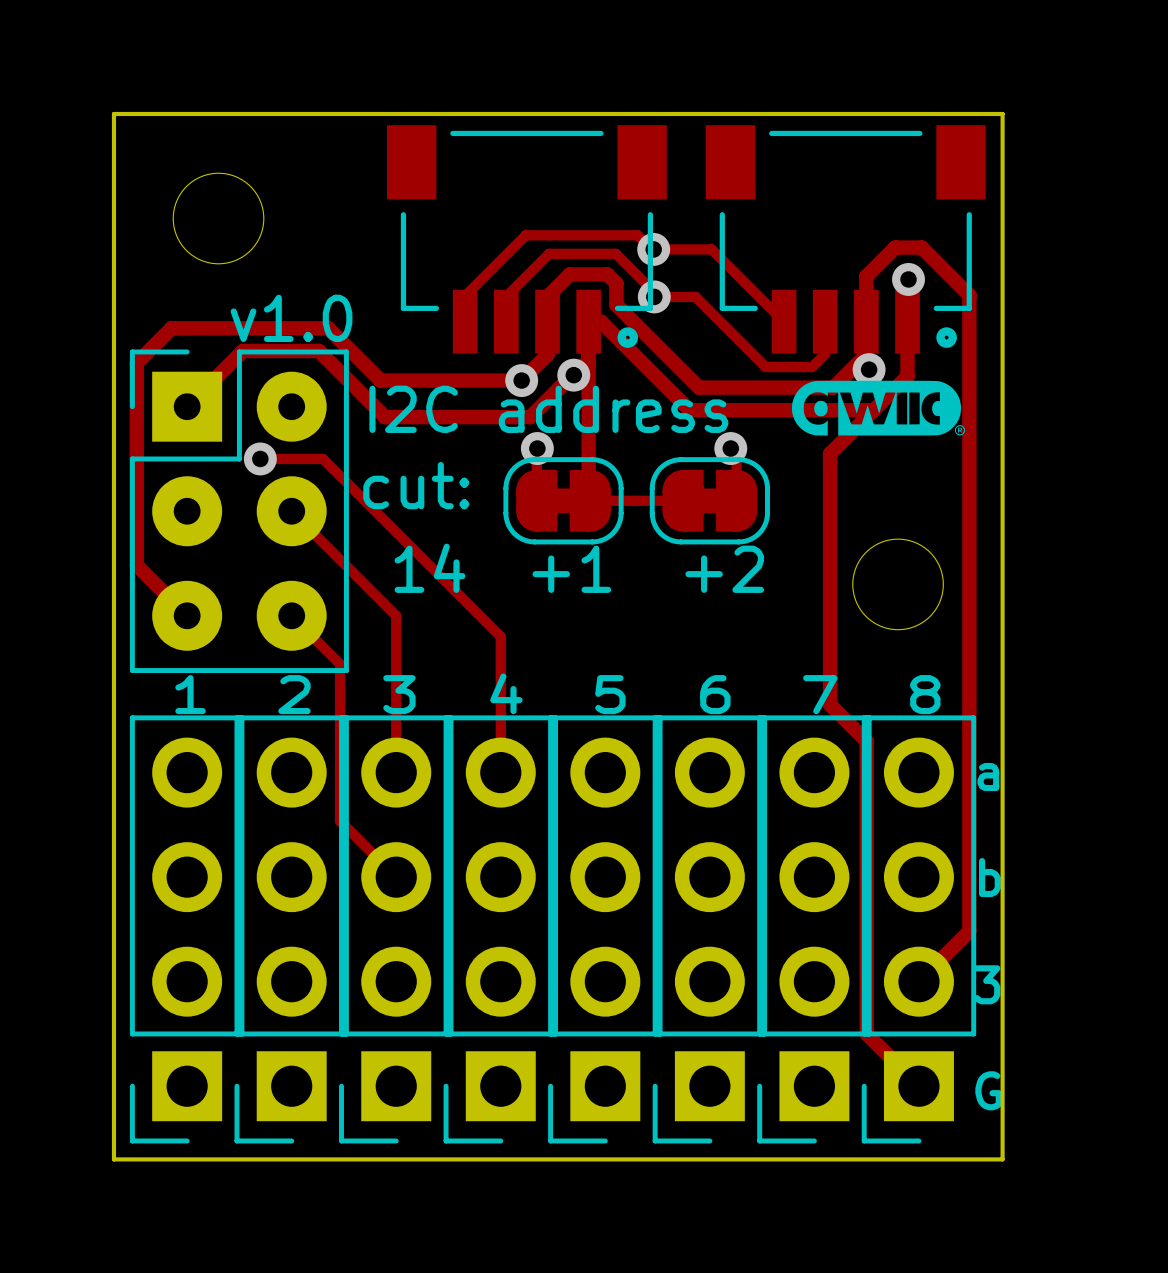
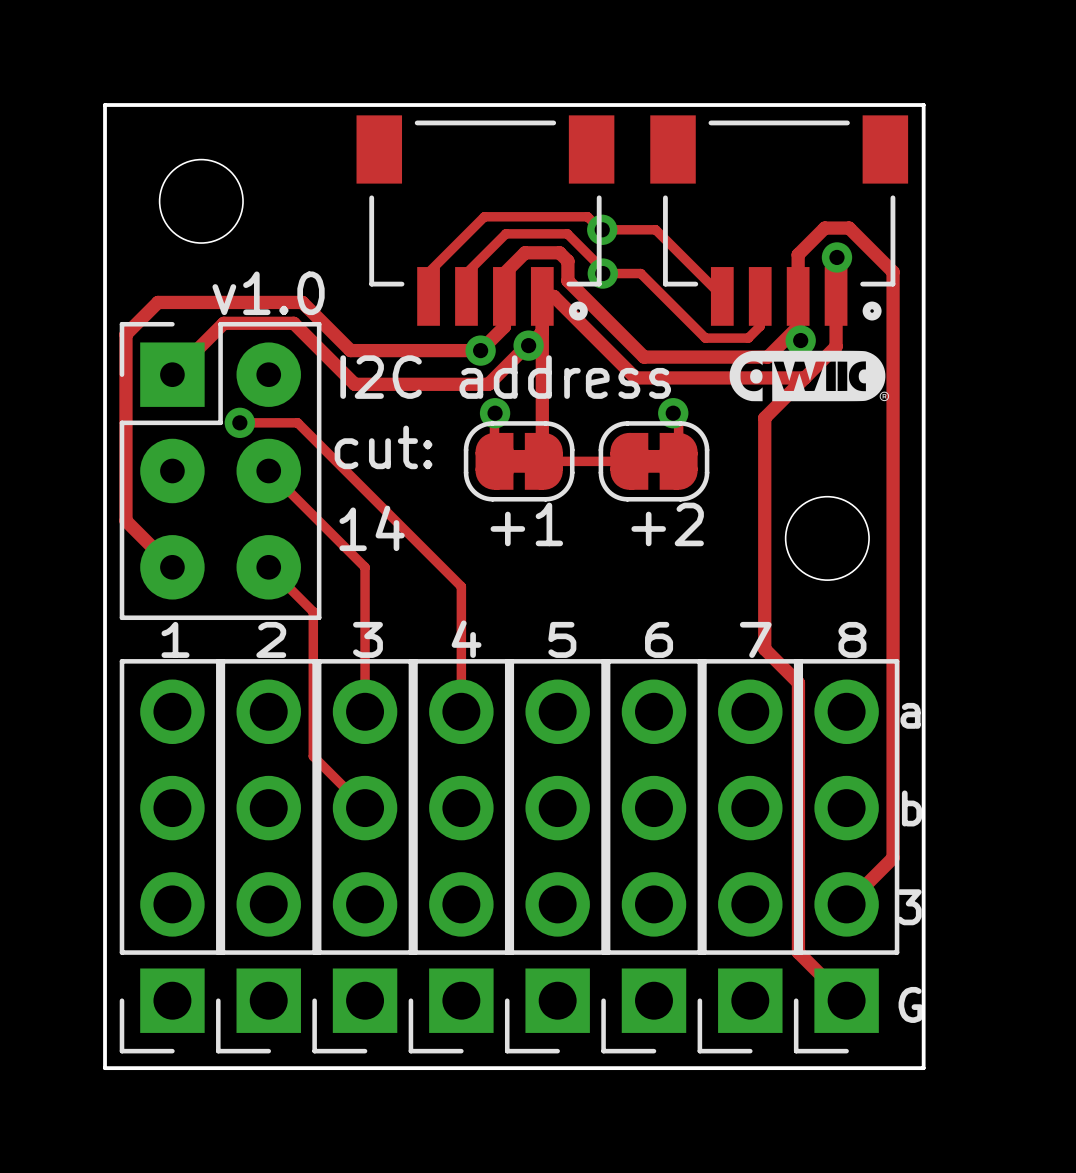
text position: 14 (430, 568) -> 14 (372, 528)

